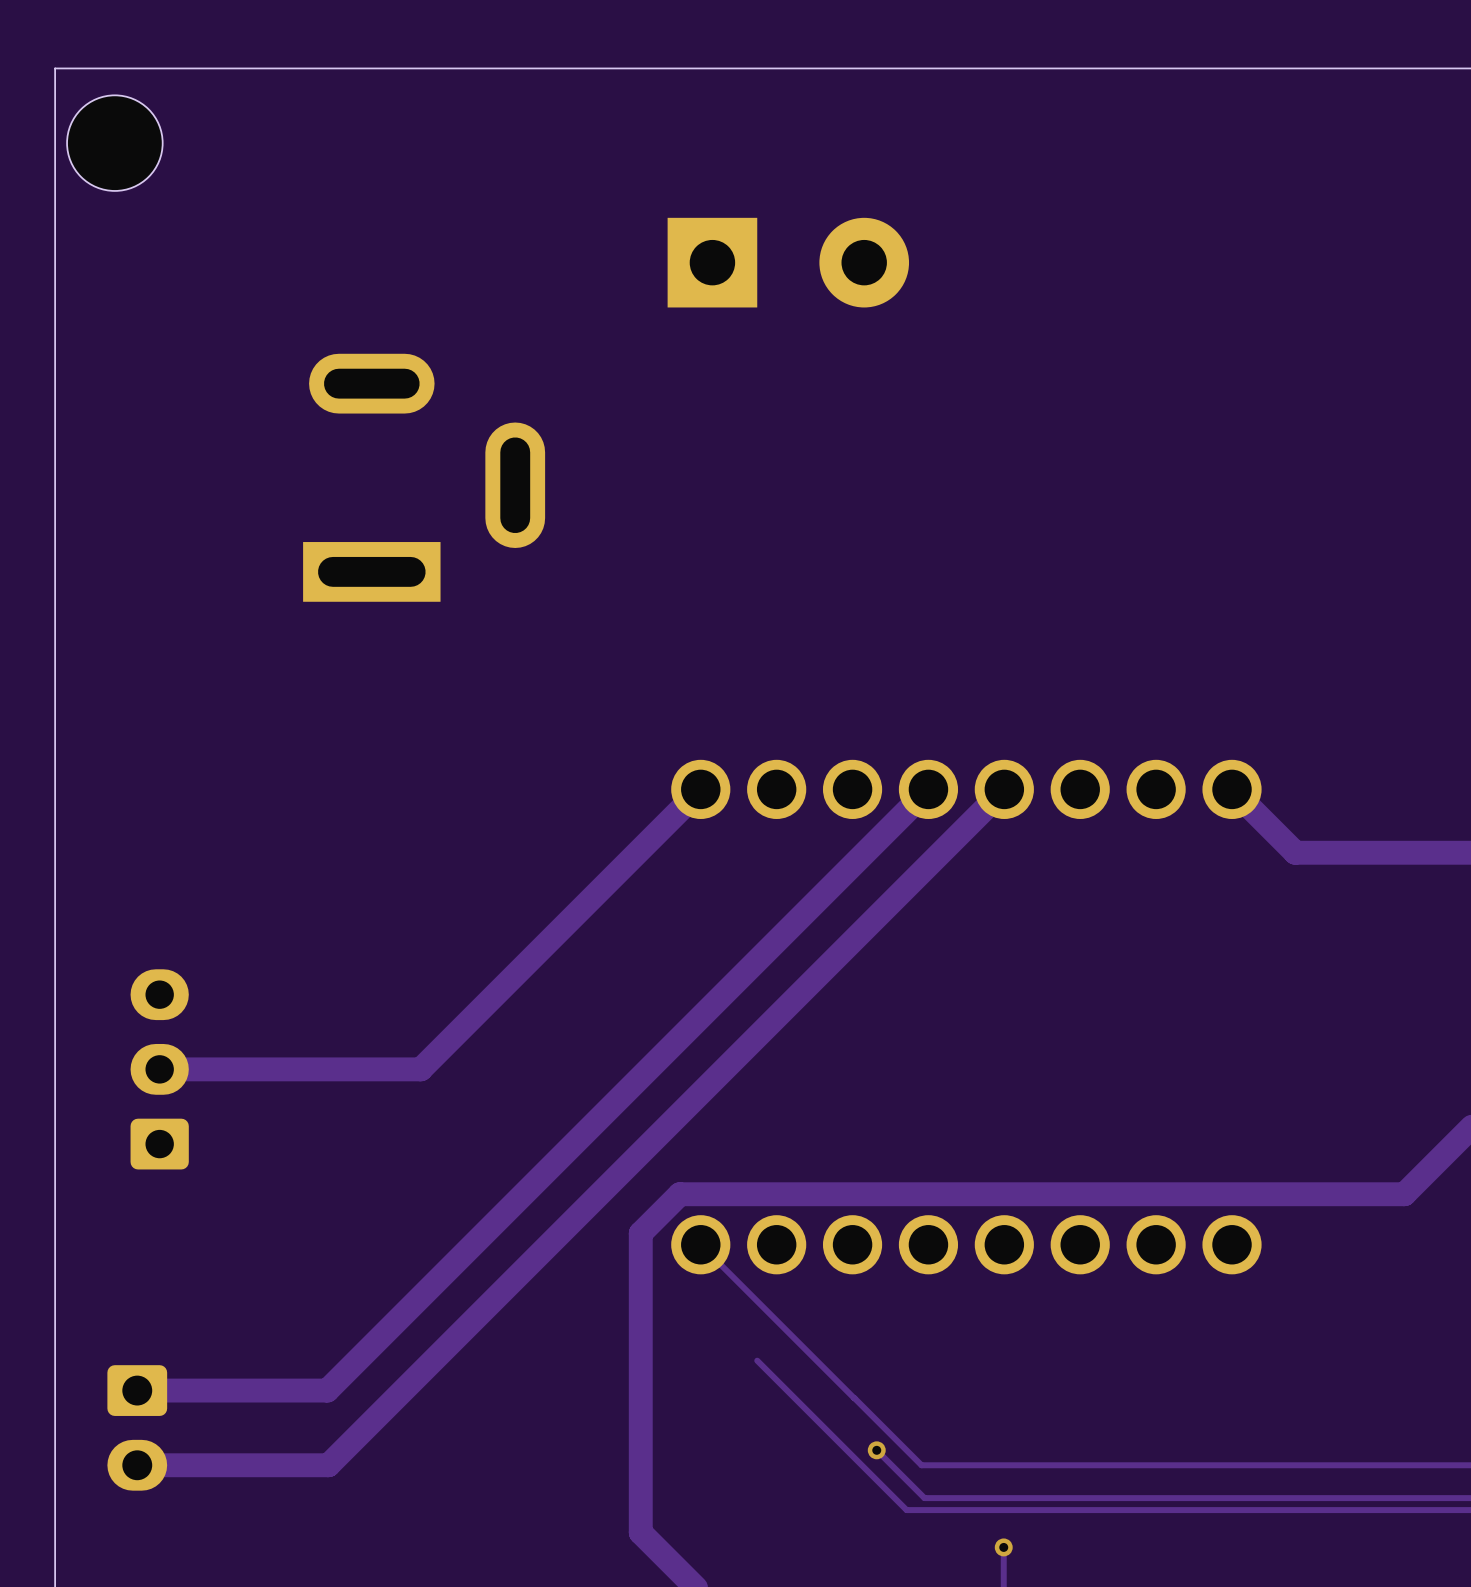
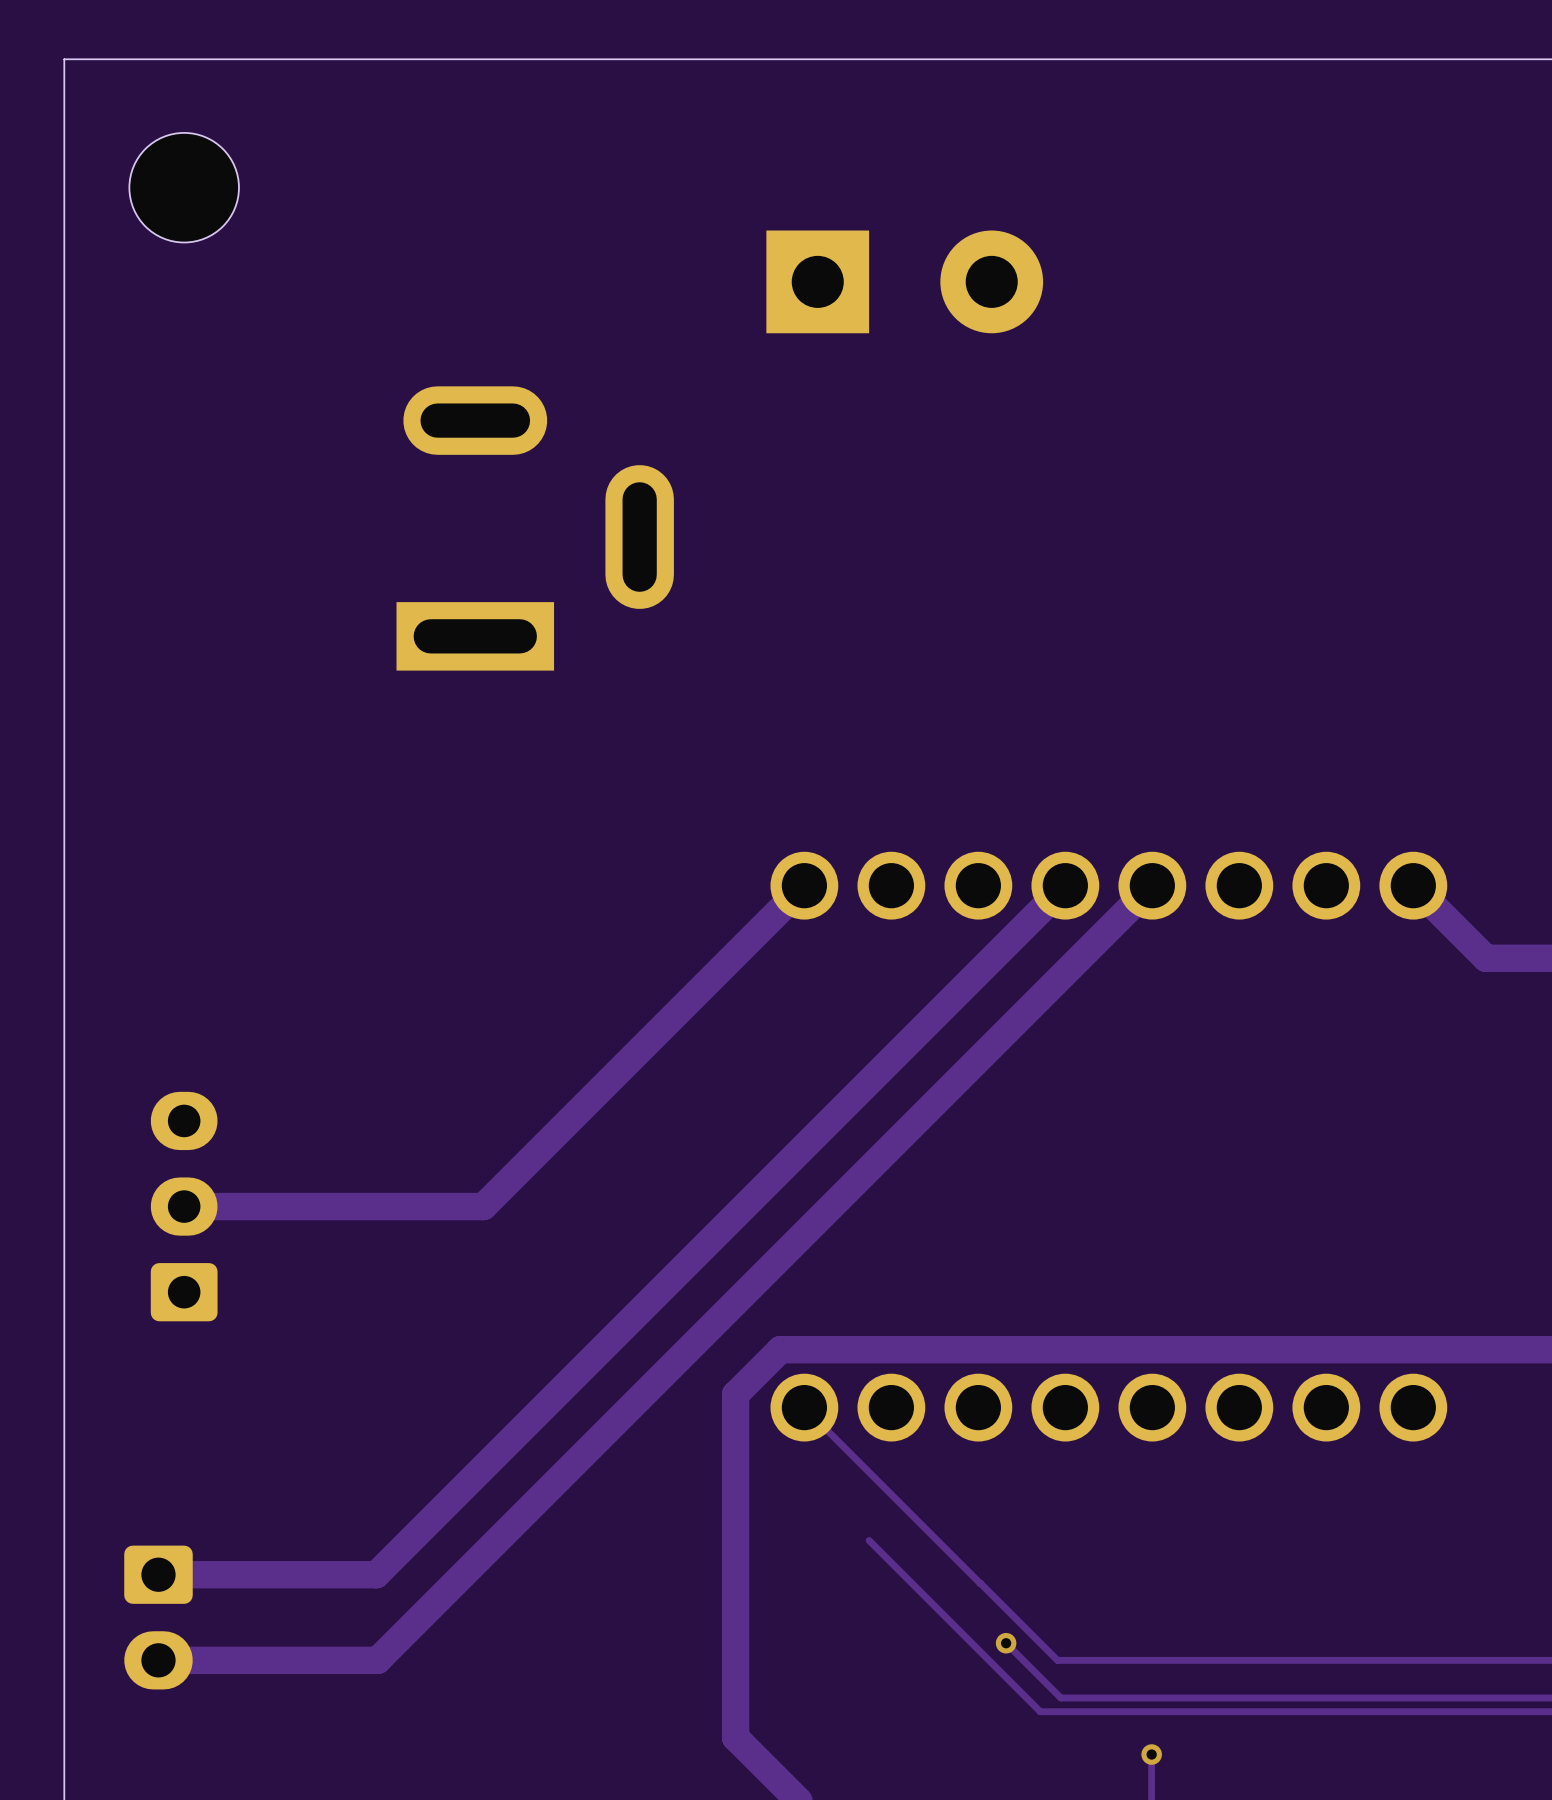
part position: (114, 143) -> (184, 187)
part position: (424, 477) -> (535, 528)

